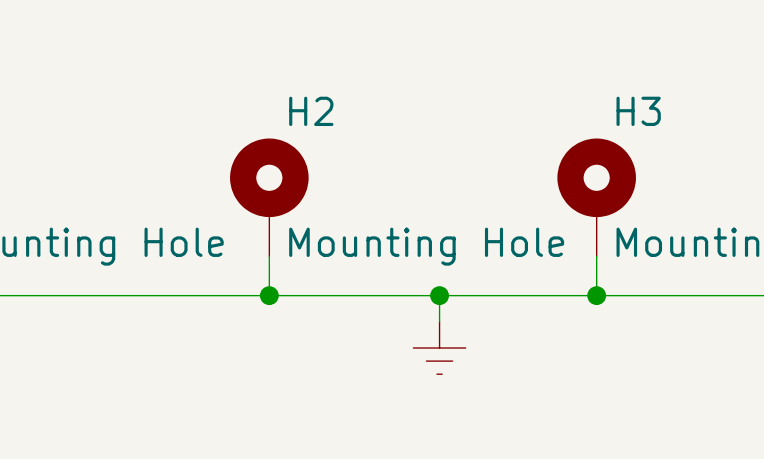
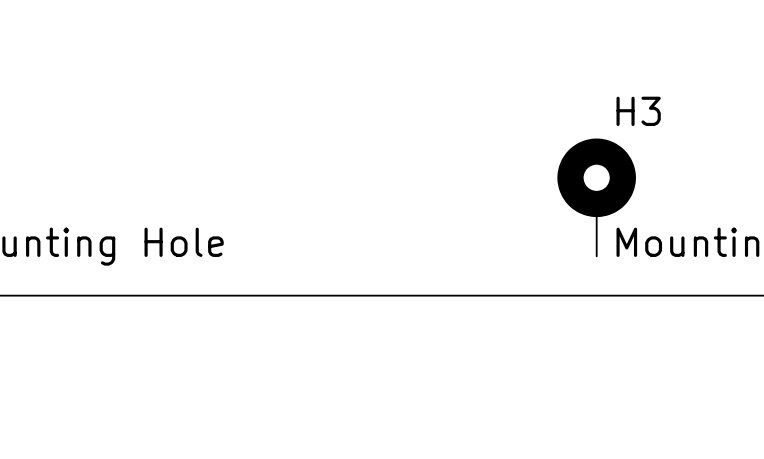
H2: Mounting Hole (269, 197) -> none
wire: (269, 256) (269, 295) -> none
wire: (596, 256) (596, 295) -> none
junction: (269, 295) -> none
wire: (439, 295) (439, 321) -> none
junction: (439, 295) -> none
junction: (596, 295) -> none
power symbol: (439, 348) -> none

